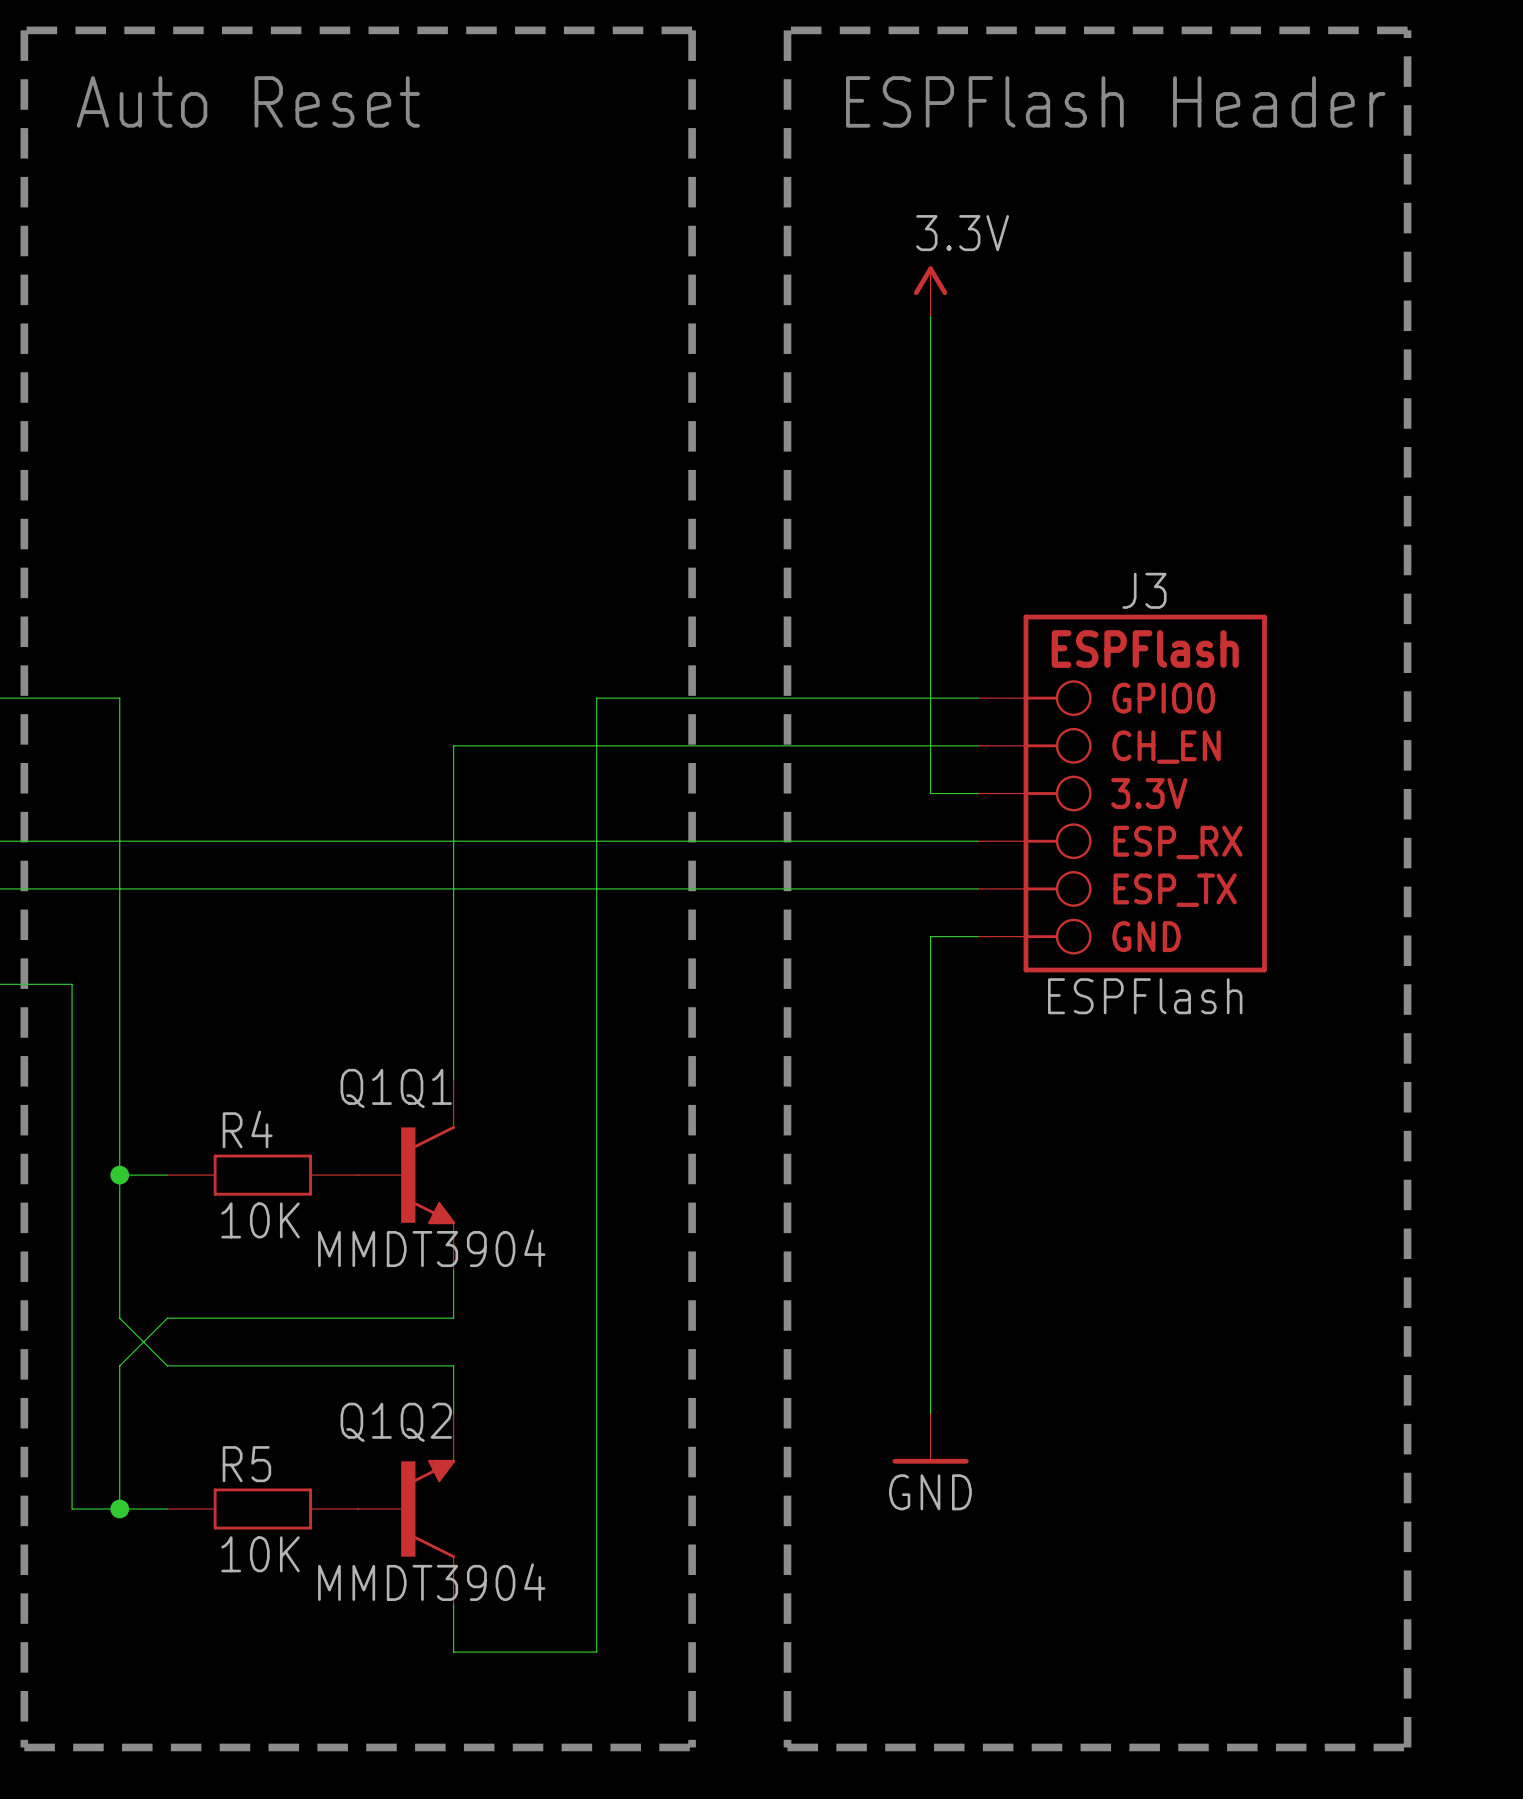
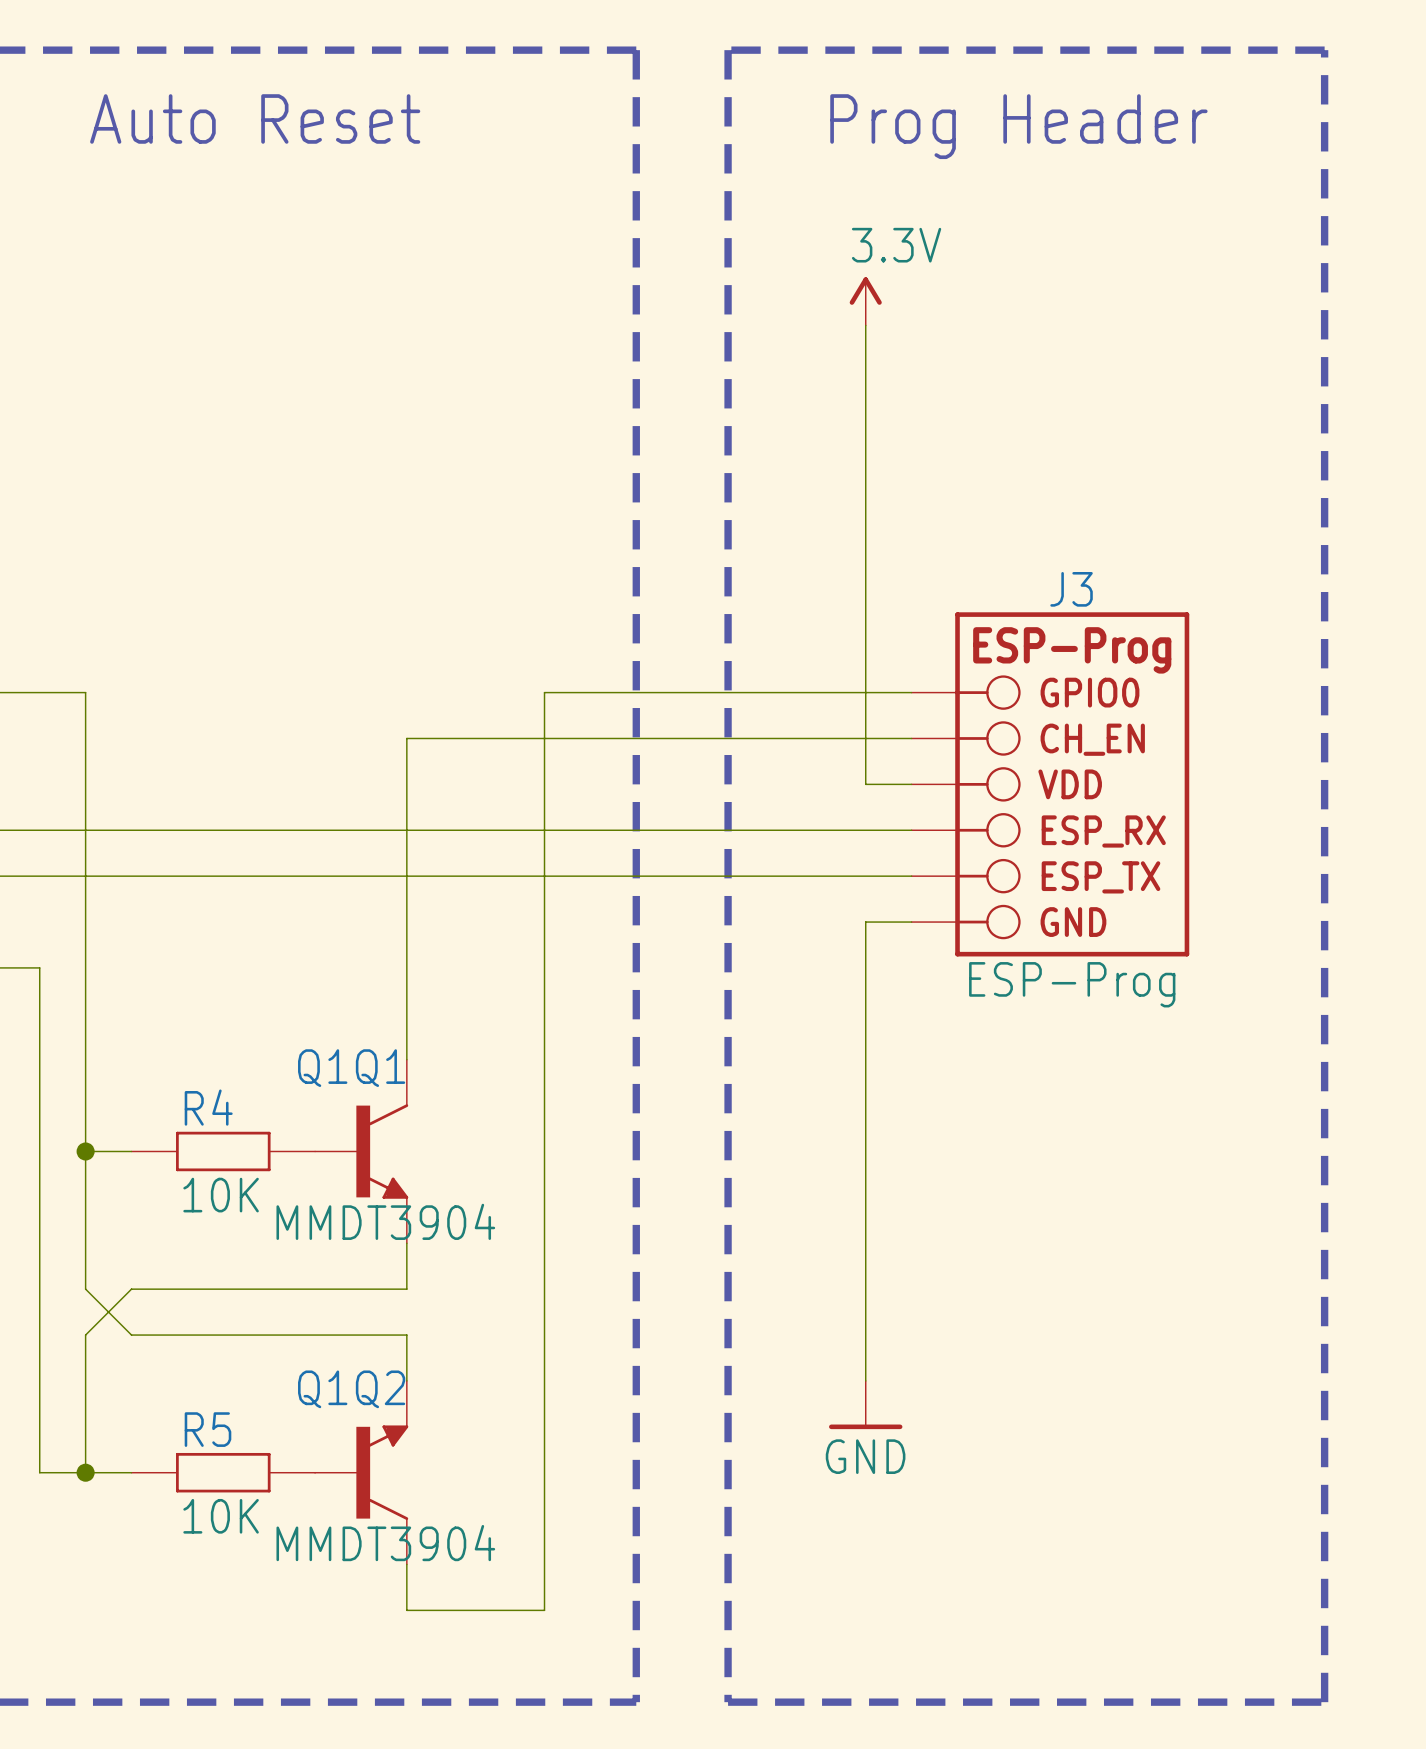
text position: Auto Reset (248, 101) -> Auto Reset (255, 118)
text: ESPFlash Header (1115, 101) -> Prog Header (1018, 126)
J3 text: ESPFlash (1145, 649) -> ESP-Prog (1072, 650)
J3 text: 3.3V (1149, 793) -> VDD (1070, 784)
J3 text: ESPFlash (1145, 996) -> ESP-Prog (1072, 984)

